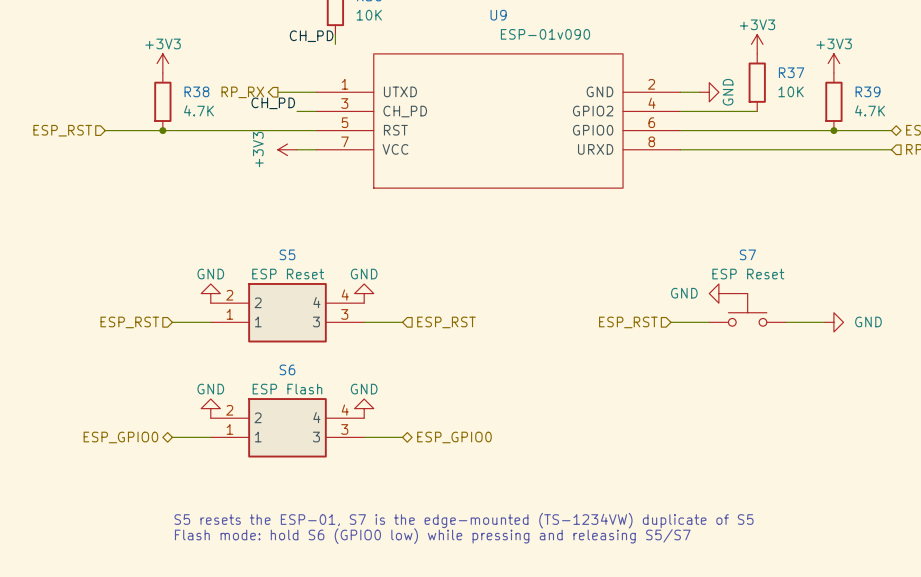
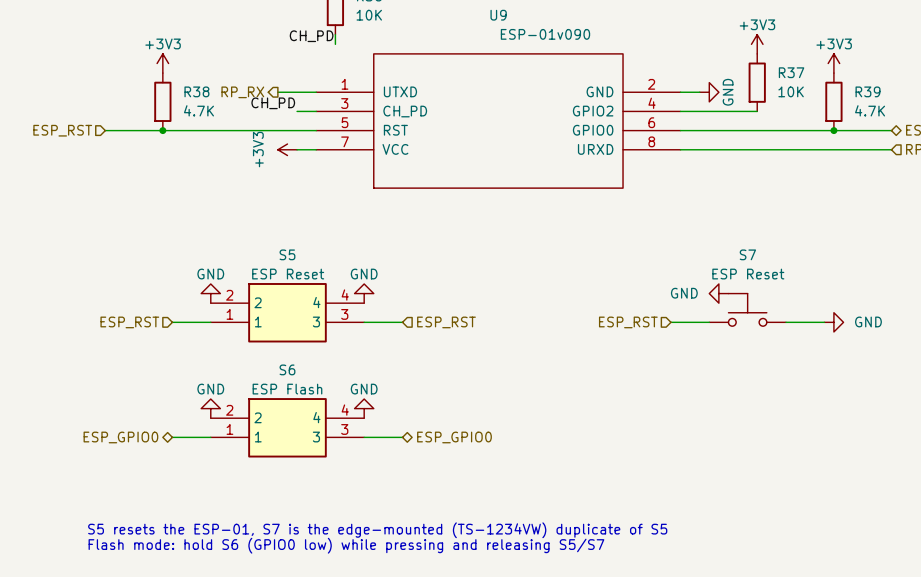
text position: S5 resets the ESP-01, S7 is the edge-mounted (TS-1234VW) duplicate of S5 (463, 520) -> S5 resets the ESP-01, S7 is the edge-mounted (TS-1234VW) duplicate of S5 (377, 530)
text position: Flash mode: hold S6 (GPIO0 low) while pressing and releasing S5/S7 (432, 536) -> Flash mode: hold S6 (GPIO0 low) while pressing and releasing S5/S7 (346, 545)

